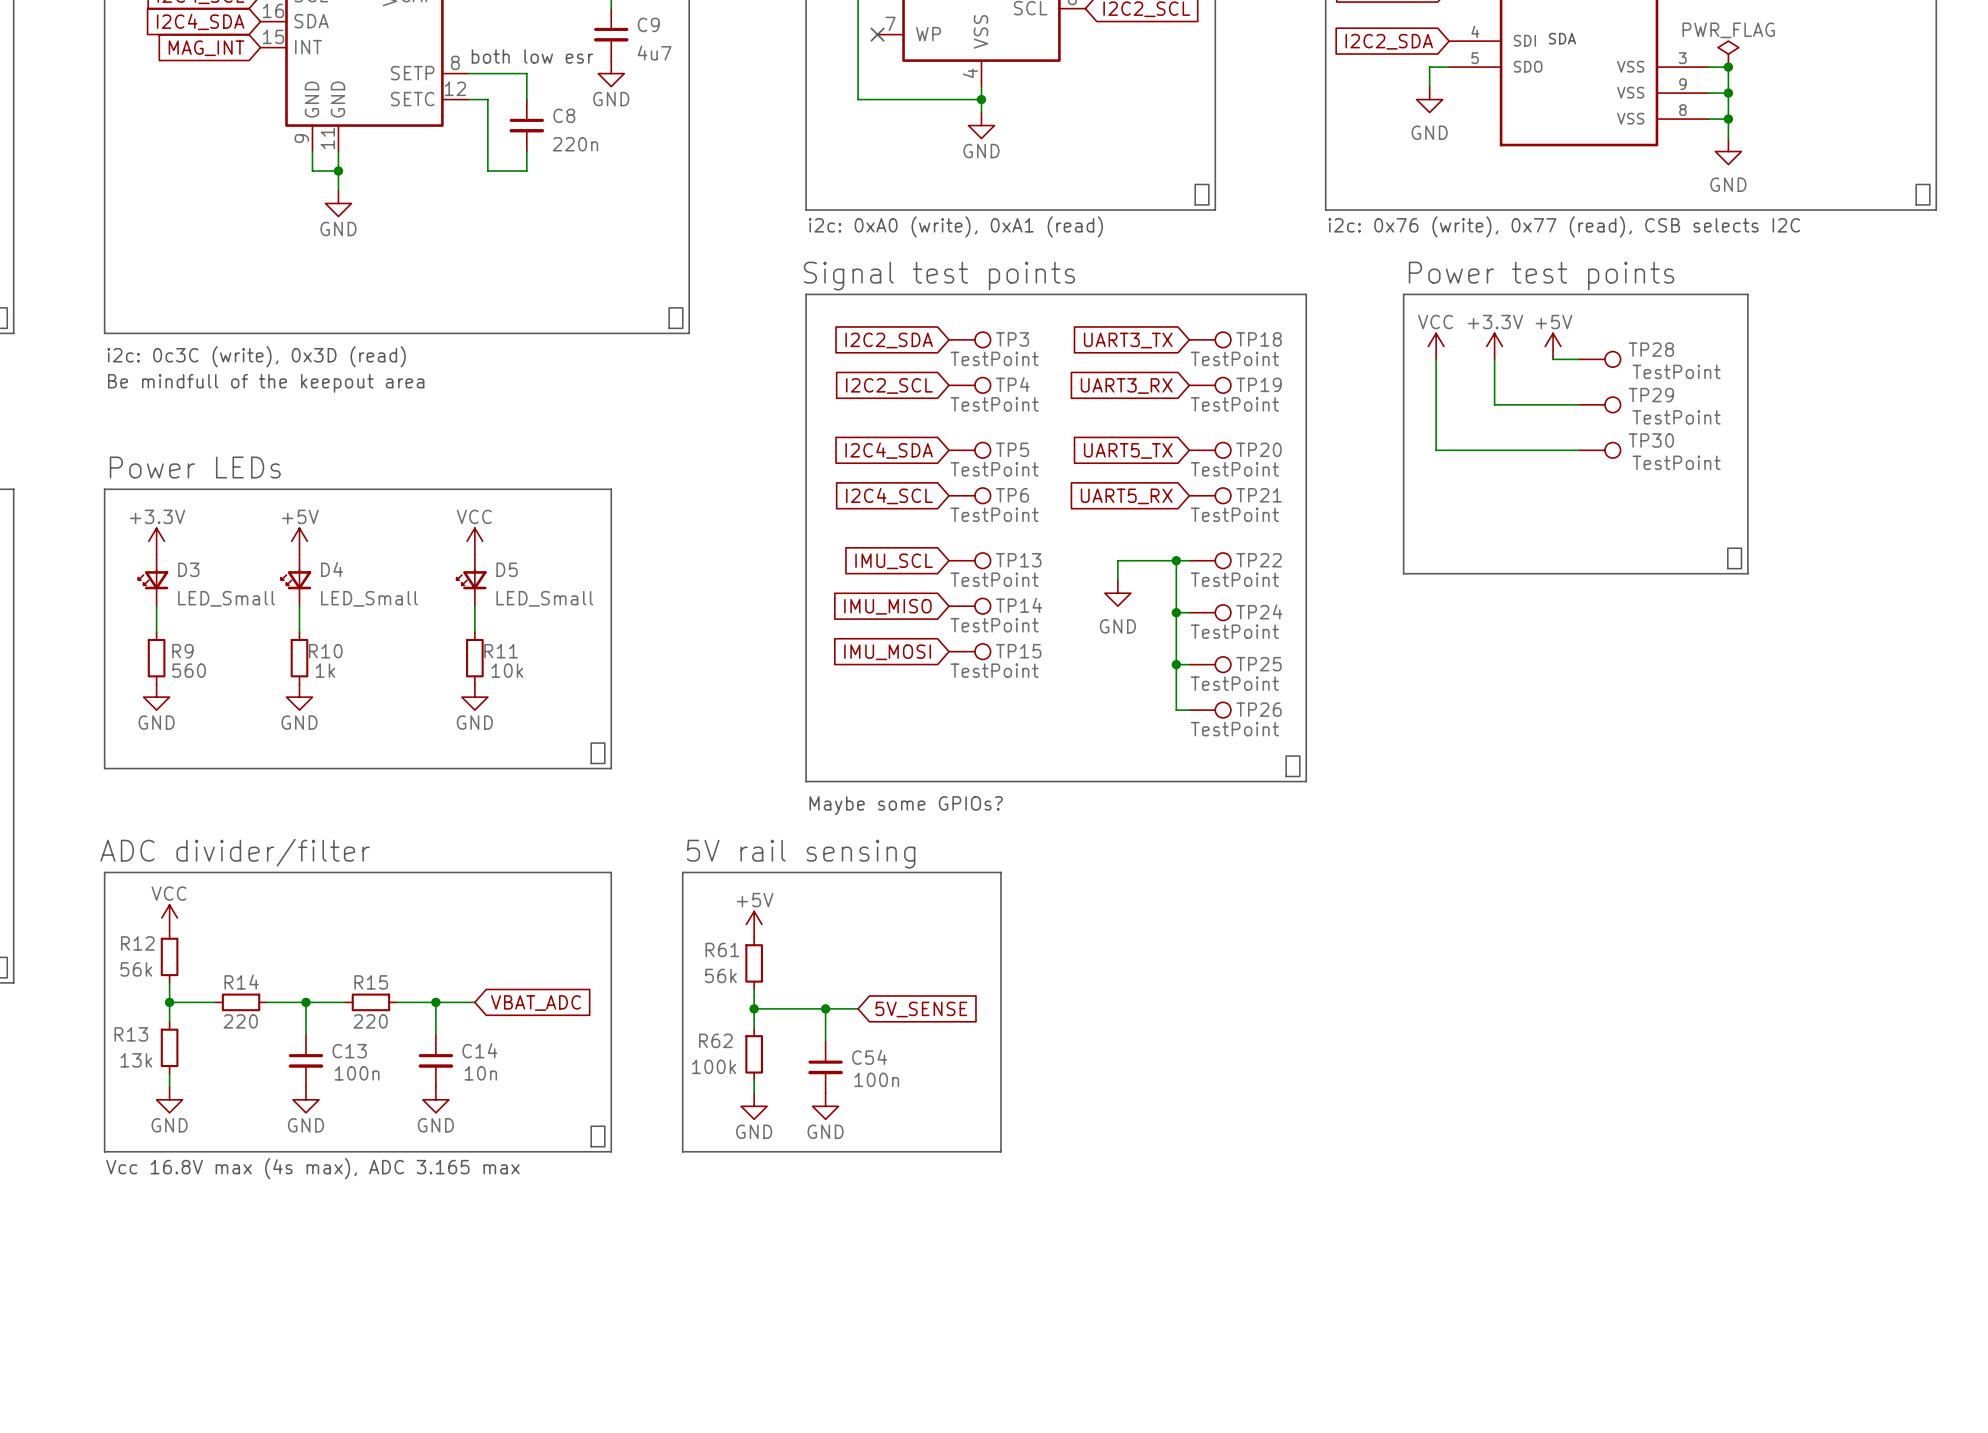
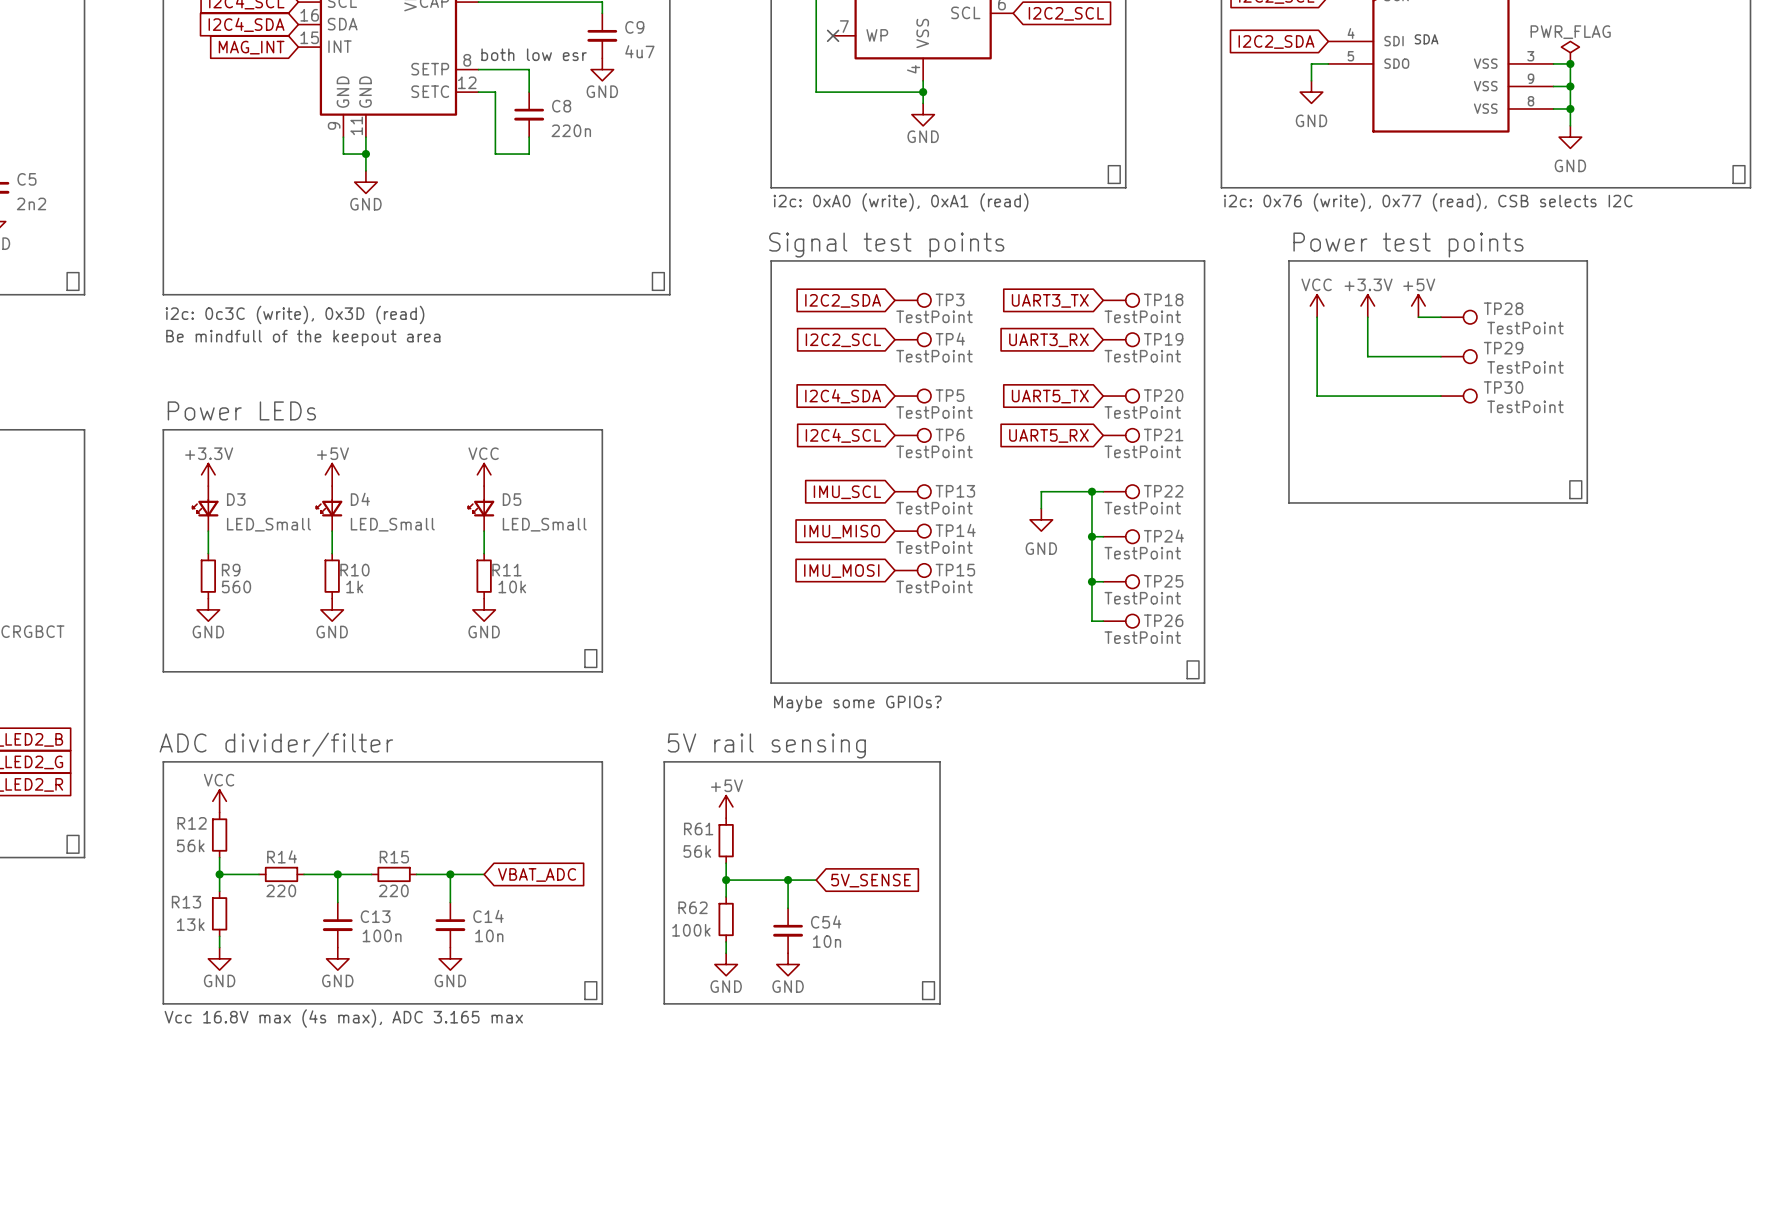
C54 value: 100n (876, 1079) -> 10n (827, 941)
text: none -> ✓ (928, 990)

